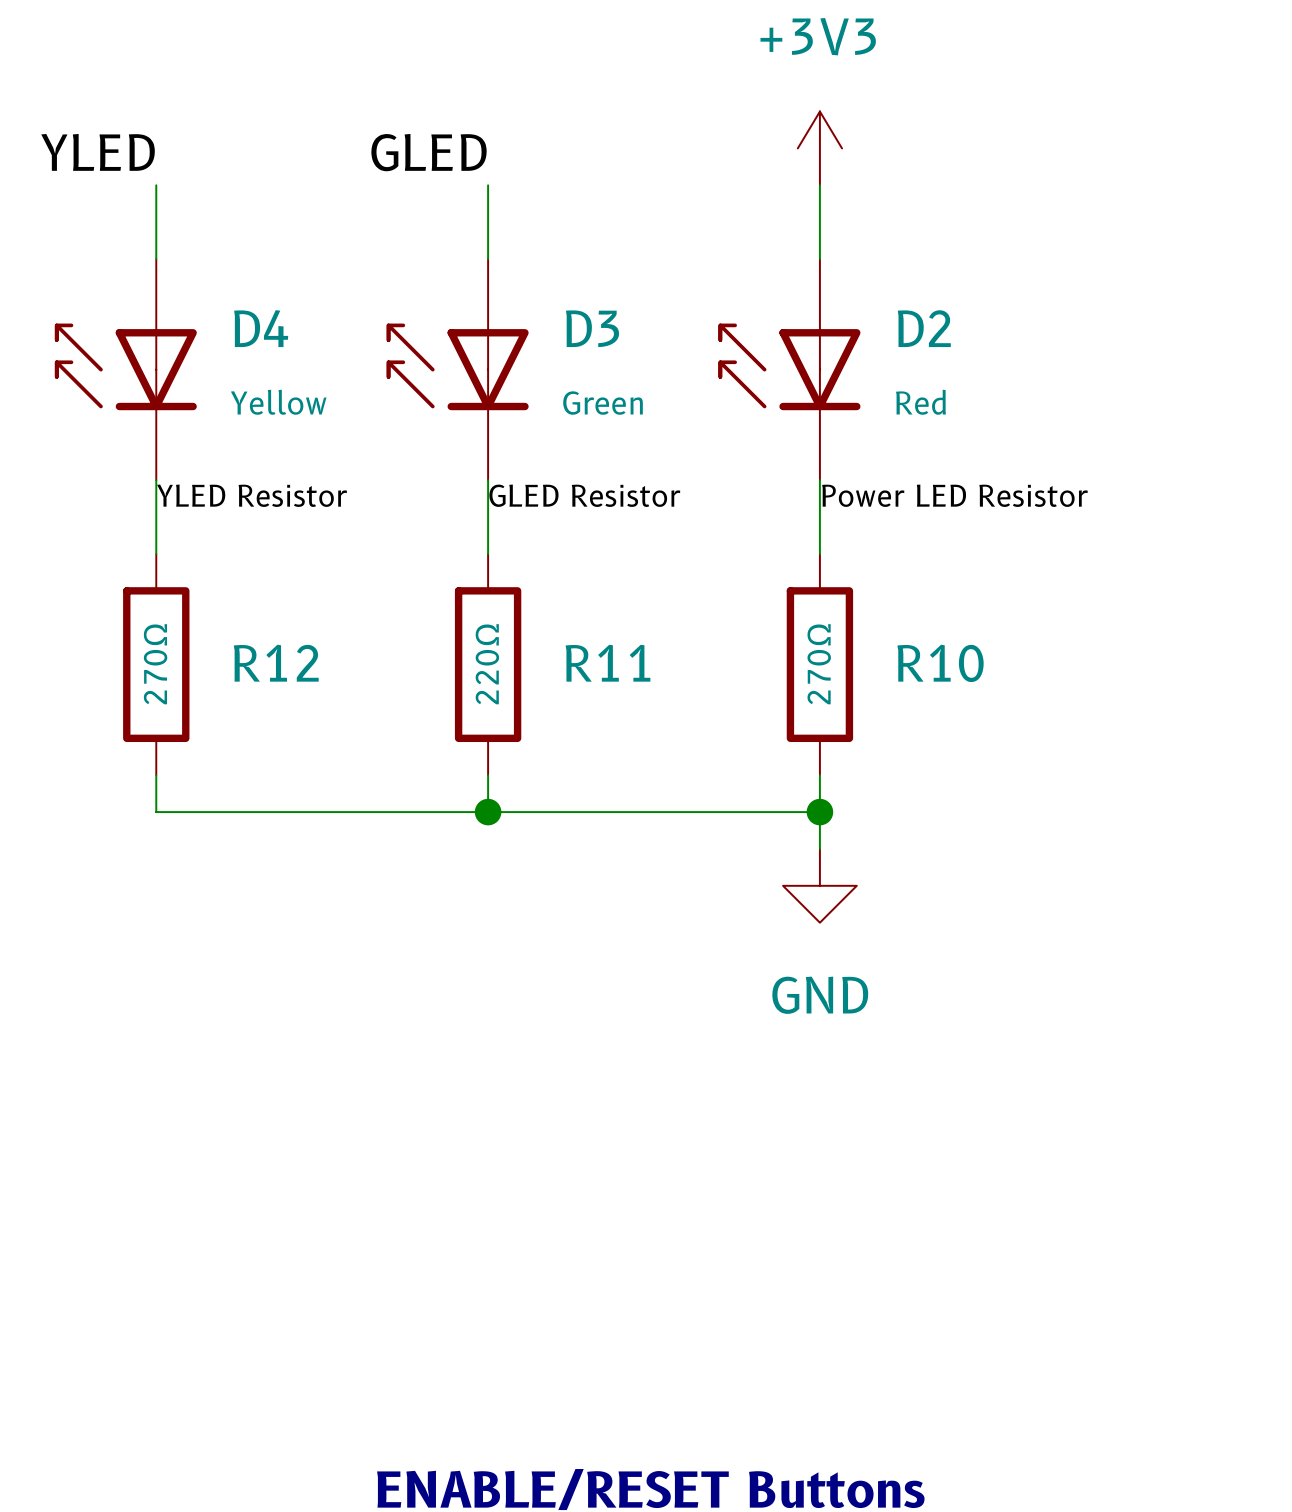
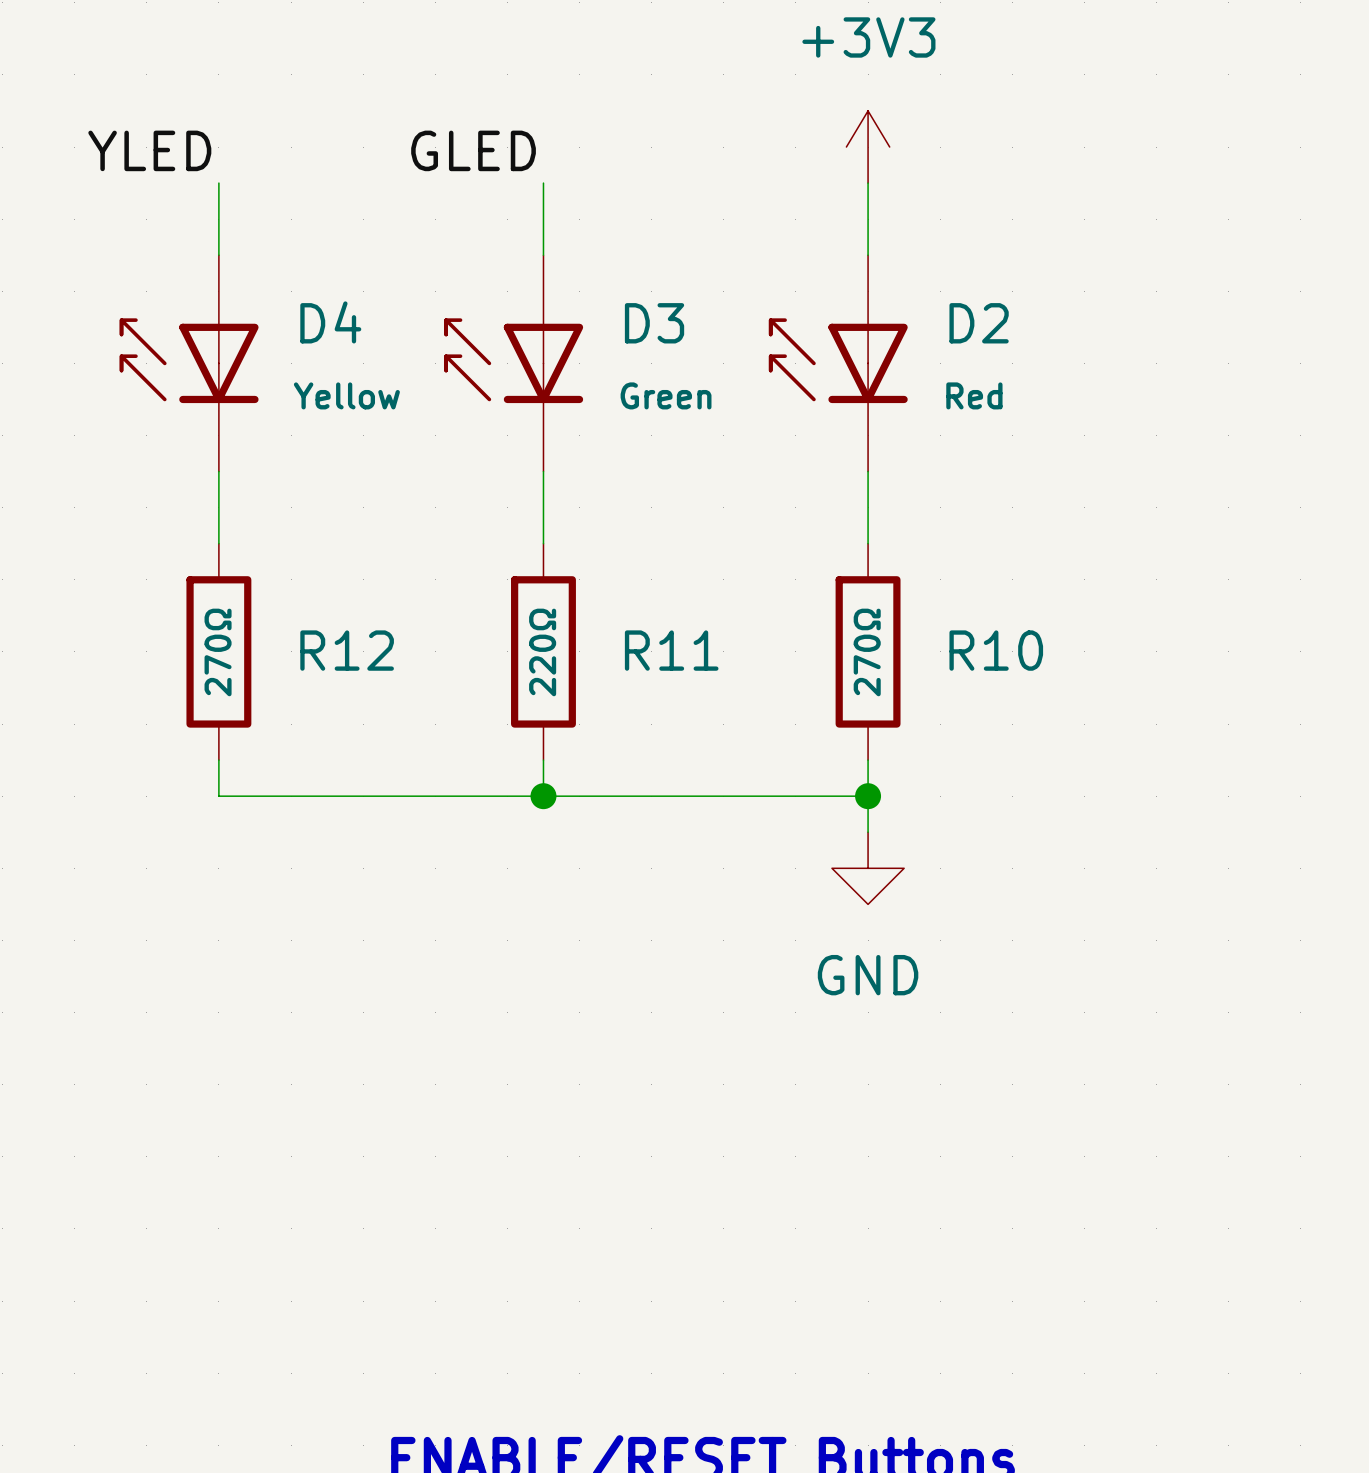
label: YLED Resistor (252, 495) -> none
label: GLED Resistor (584, 495) -> none
label: Power LED Resistor (954, 495) -> none

